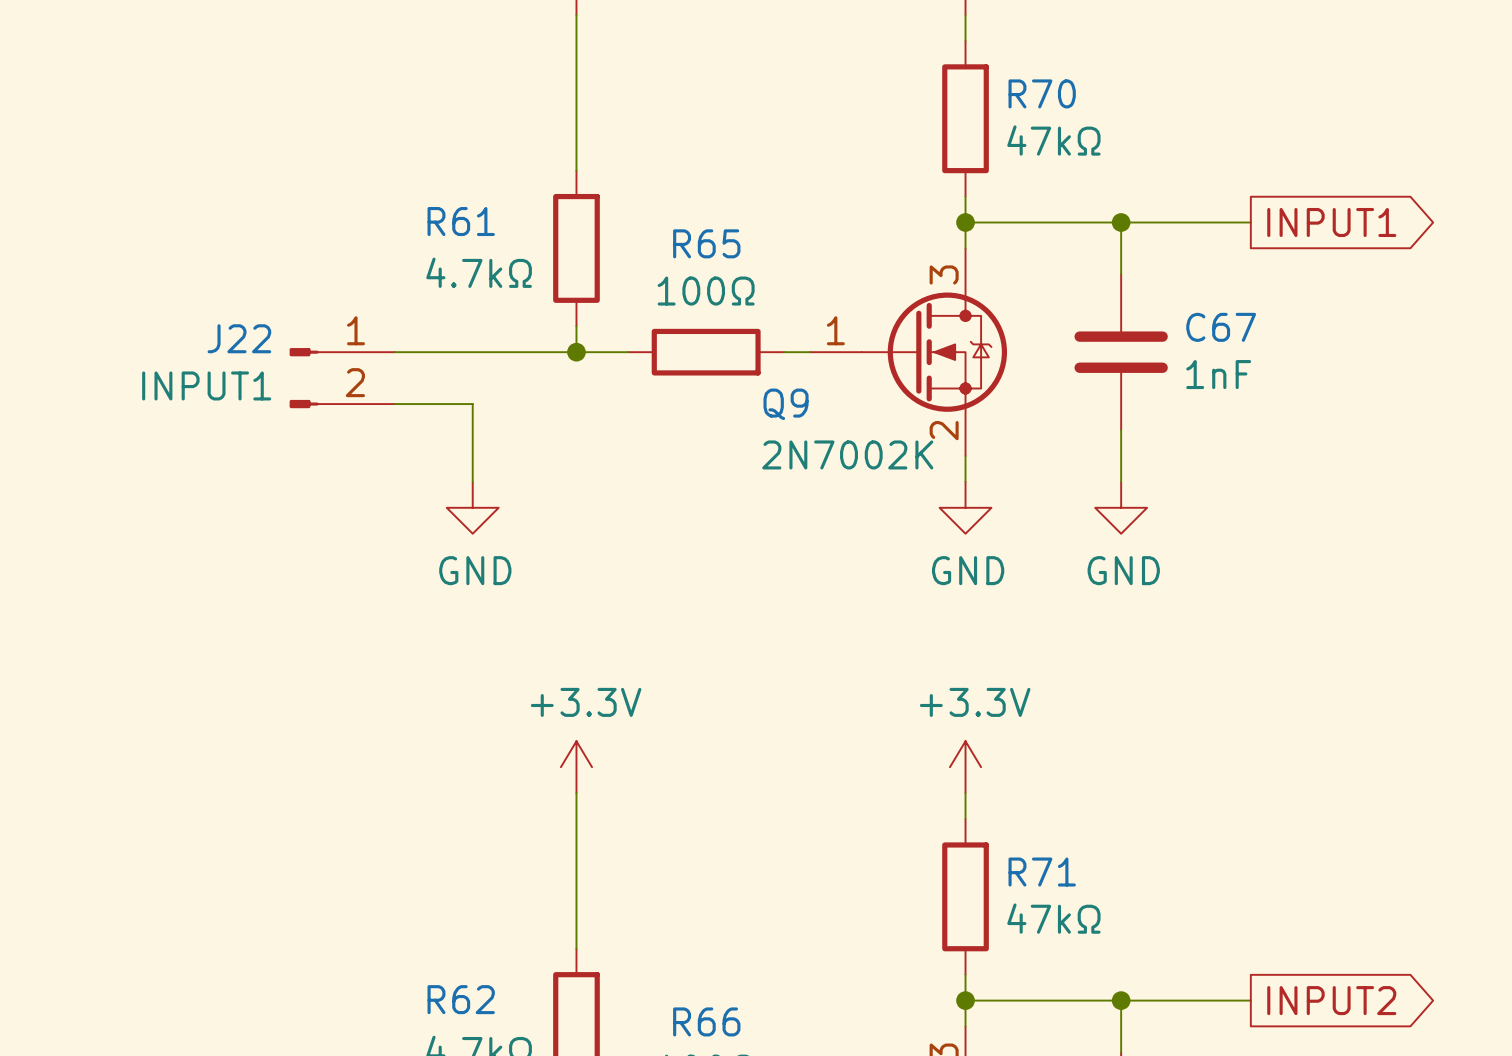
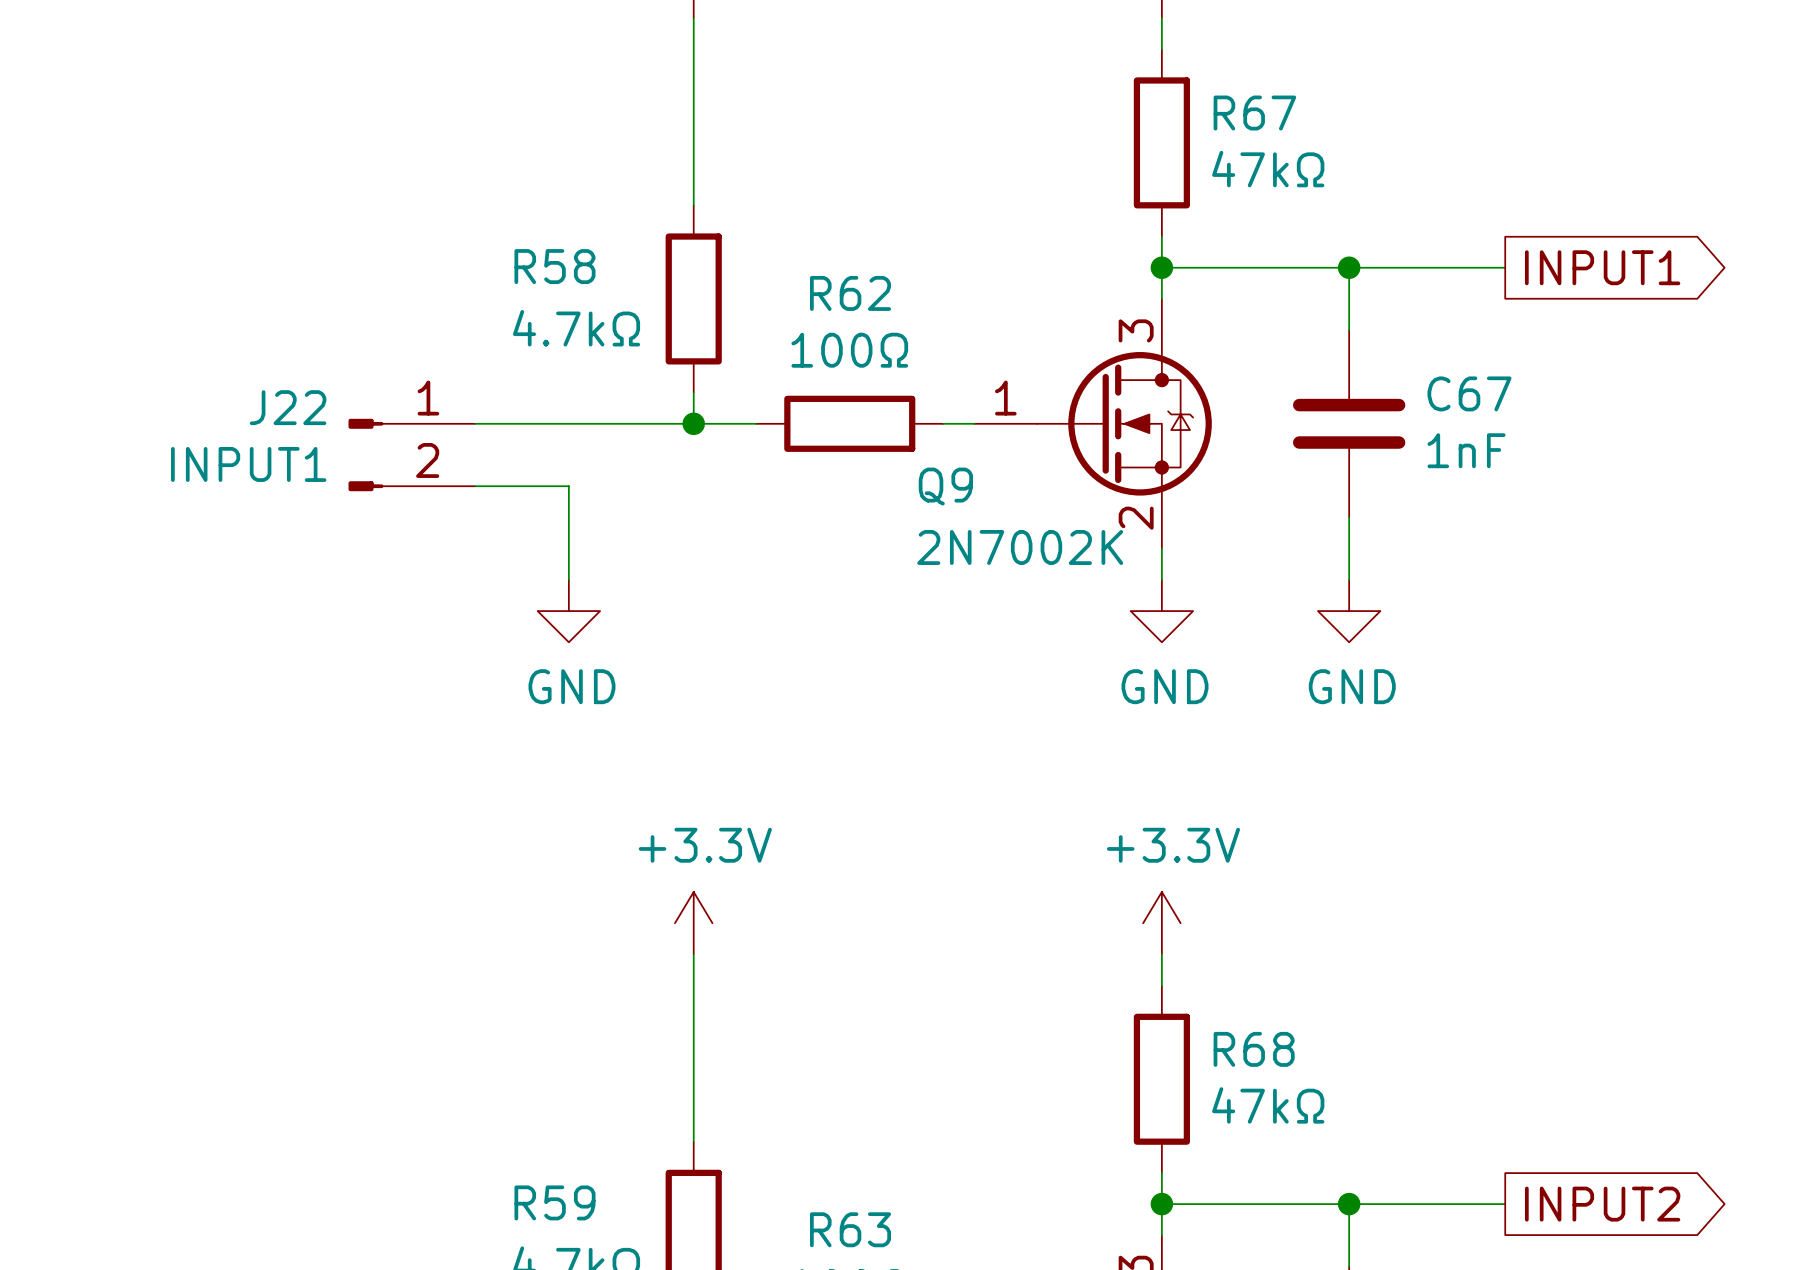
R70 name: R70 (1042, 93) -> R67 (1254, 113)
R61 name: R61 (461, 221) -> R58 (554, 266)
R65 name: R65 (706, 243) -> R62 (850, 293)
R71 name: R71 (1042, 872) -> R68 (1254, 1049)
R62 name: R62 (461, 999) -> R59 (554, 1202)
R66 name: R66 (706, 1021) -> R63 (850, 1229)

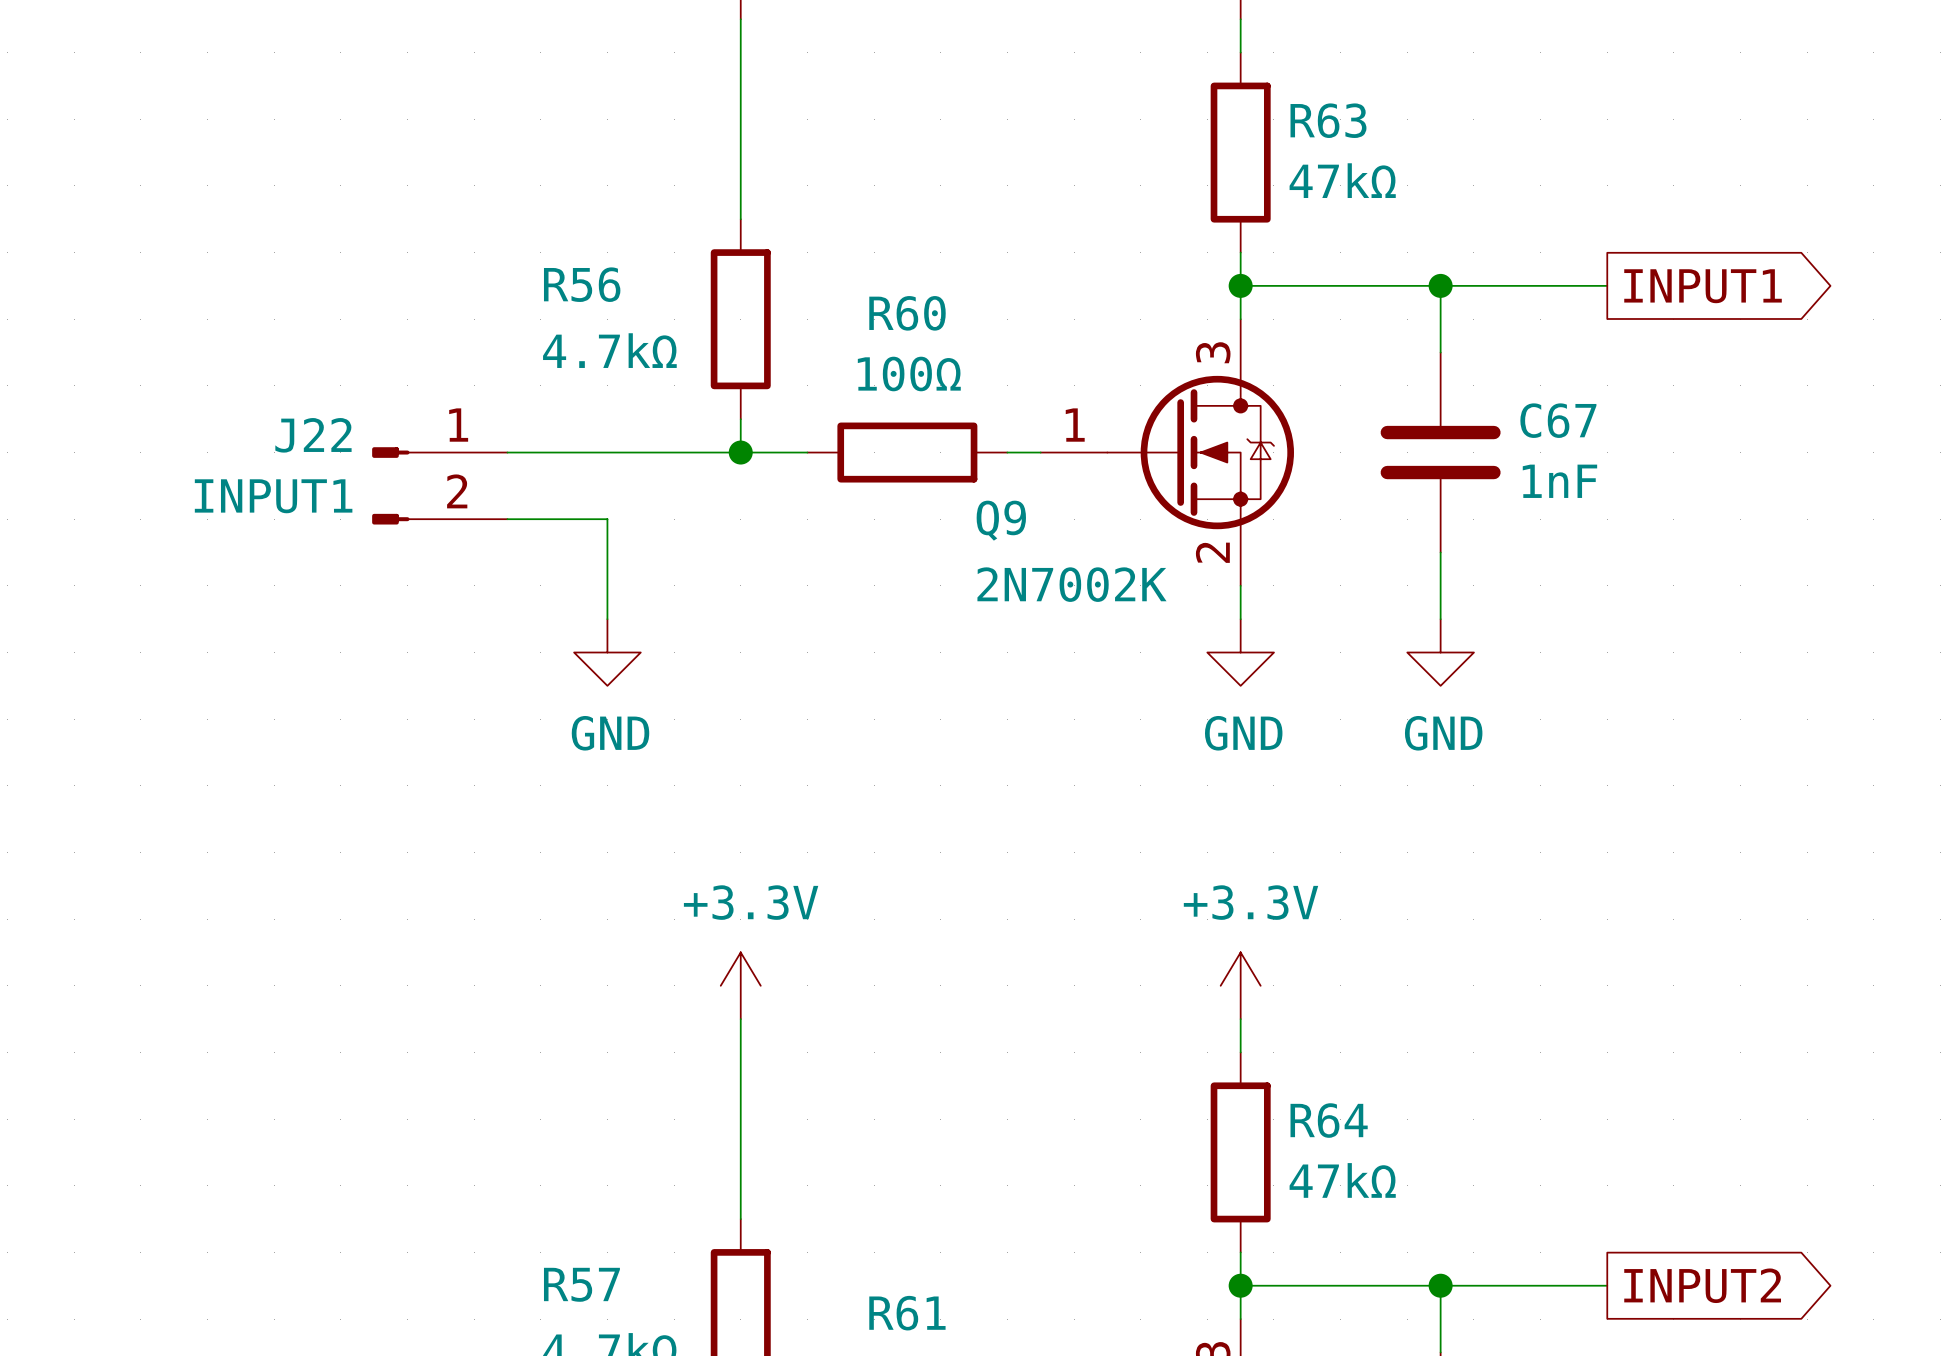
R67 name: R67 (1254, 113) -> R63 (1328, 120)
R58 name: R58 (554, 266) -> R56 (582, 284)
R62 name: R62 (850, 293) -> R60 (907, 313)
R68 name: R68 (1254, 1049) -> R64 (1329, 1120)
R59 name: R59 (554, 1202) -> R57 (581, 1284)
R63 name: R63 (850, 1229) -> R61 (907, 1313)

